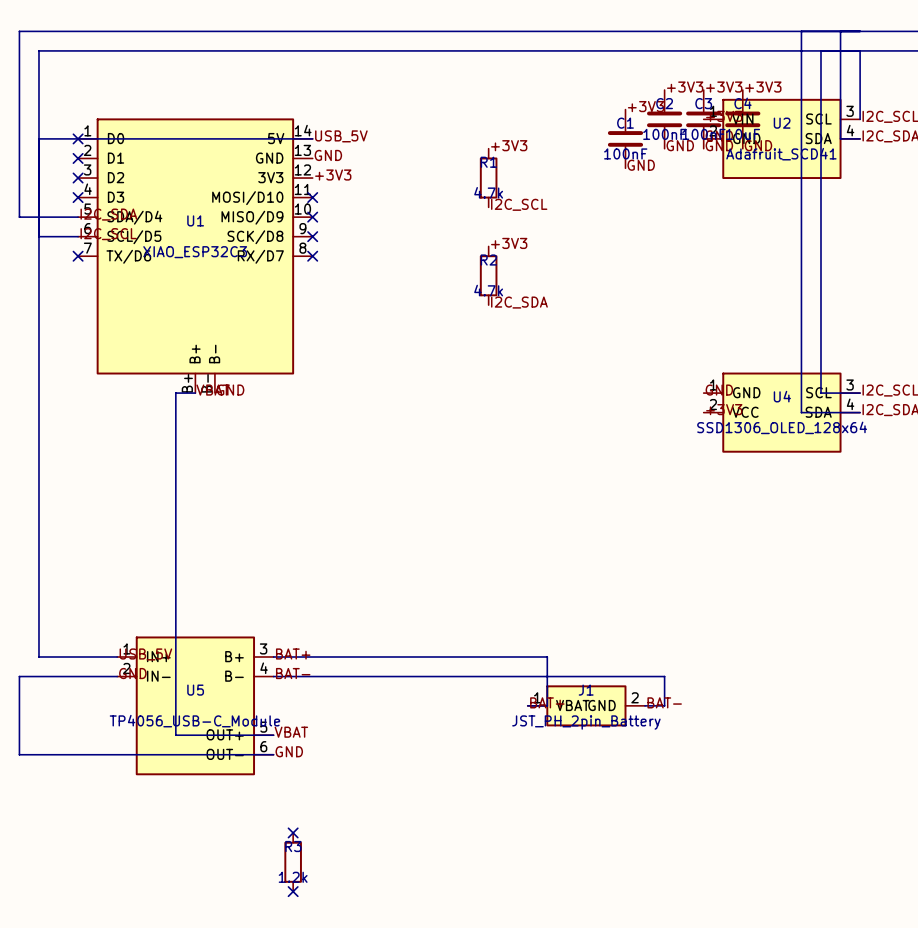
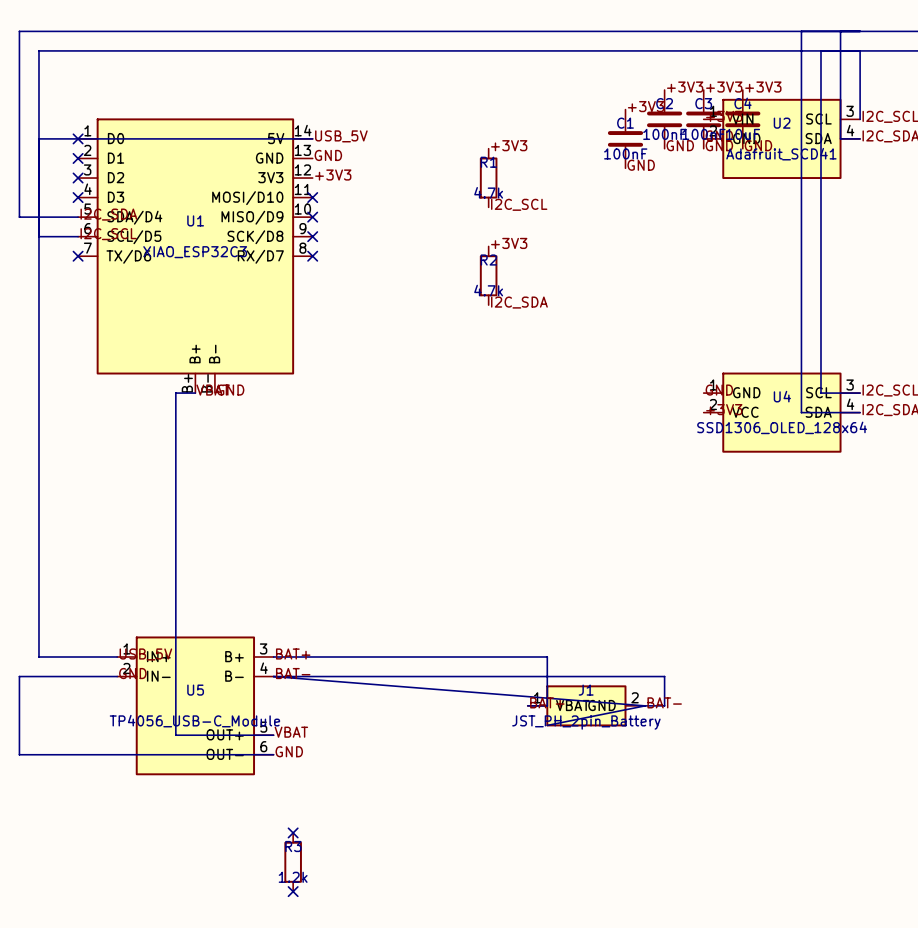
wire: none -> (273, 676) (645, 705) (547, 725)

